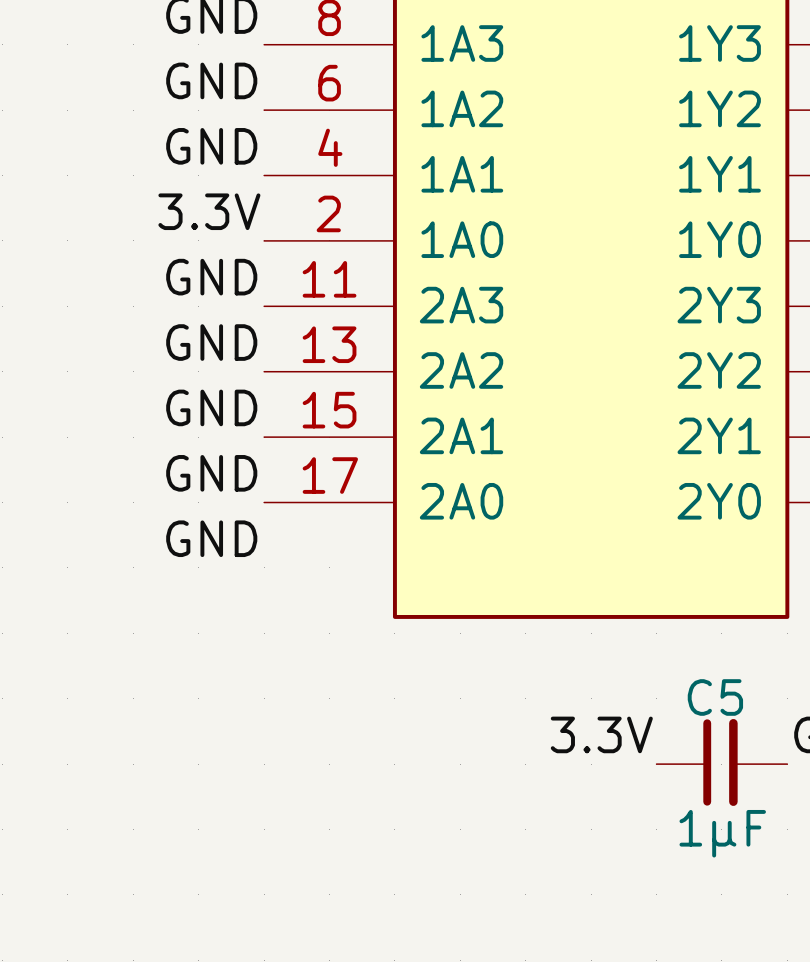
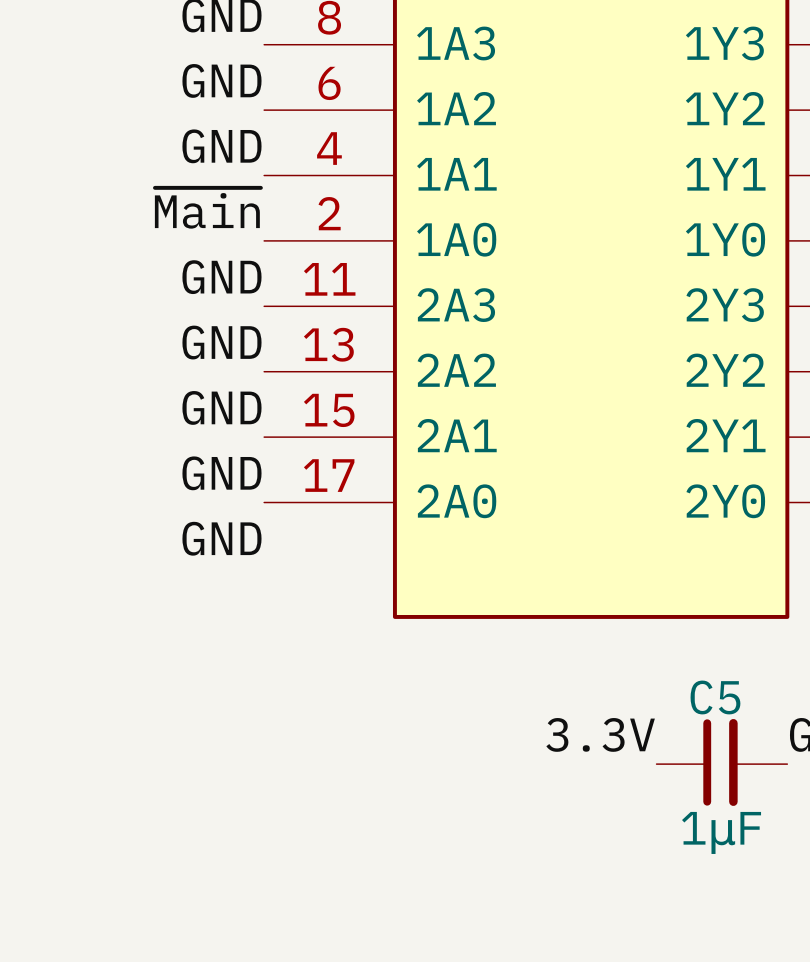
label: 3.3V (209, 211) -> ~{Main} (207, 208)

